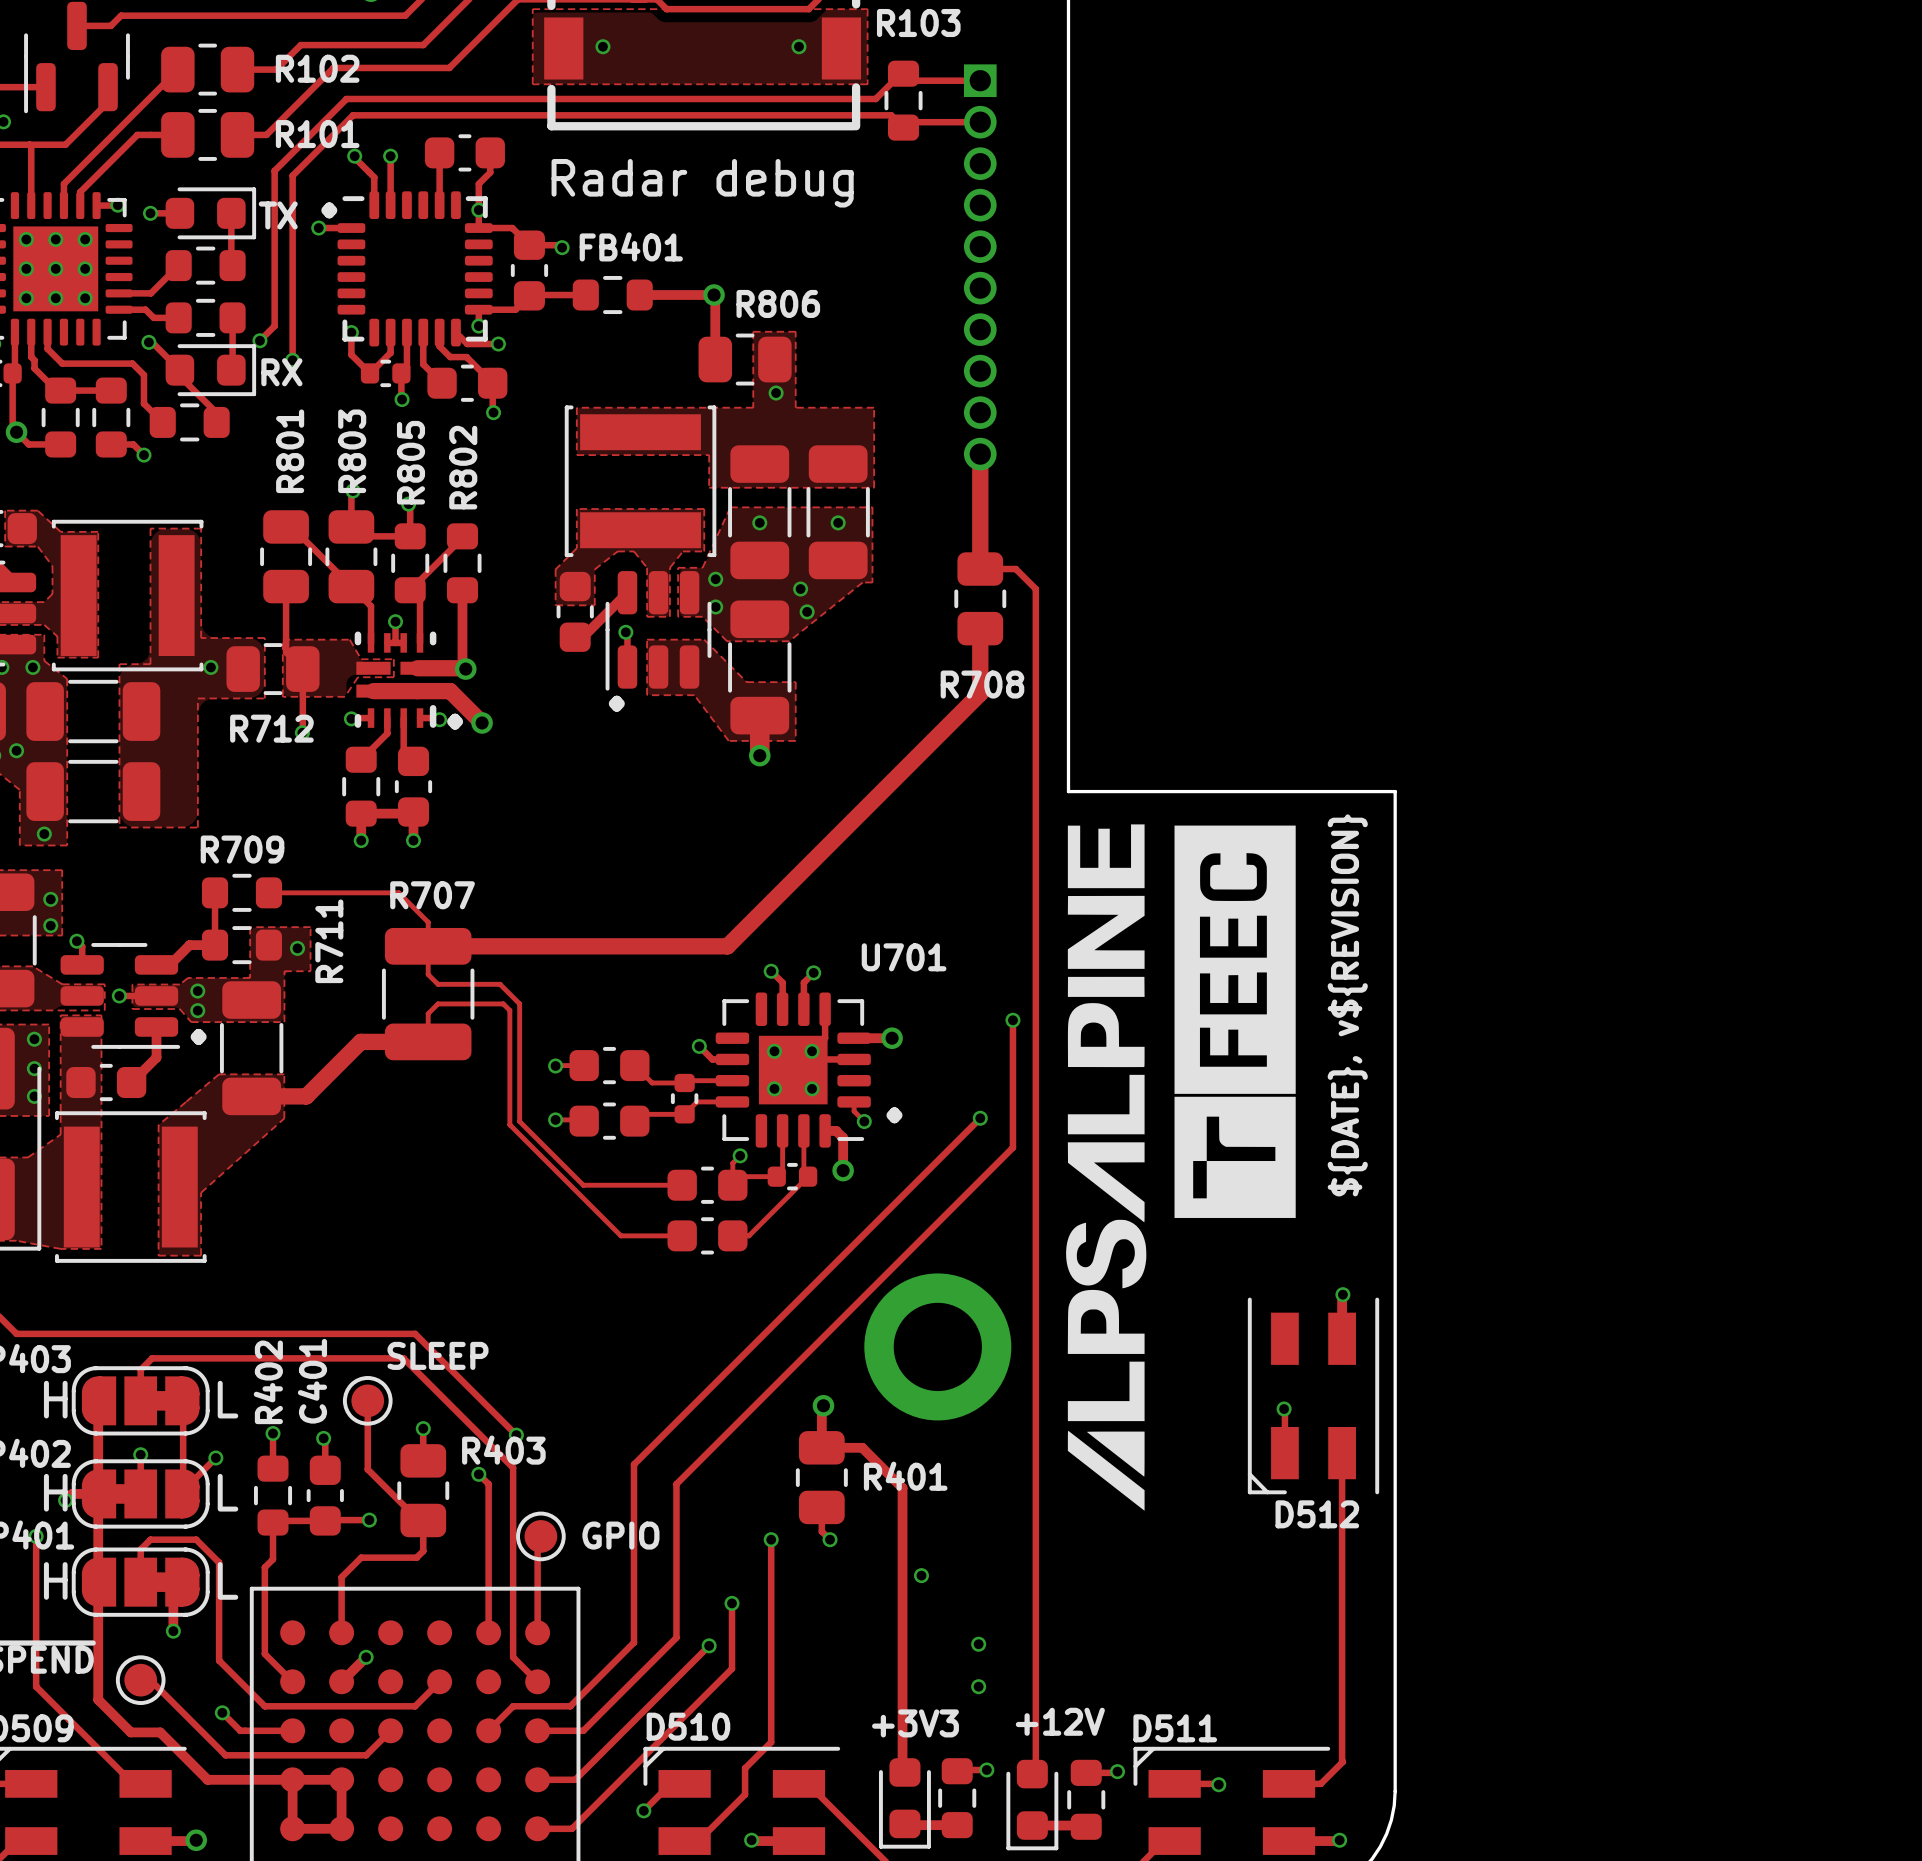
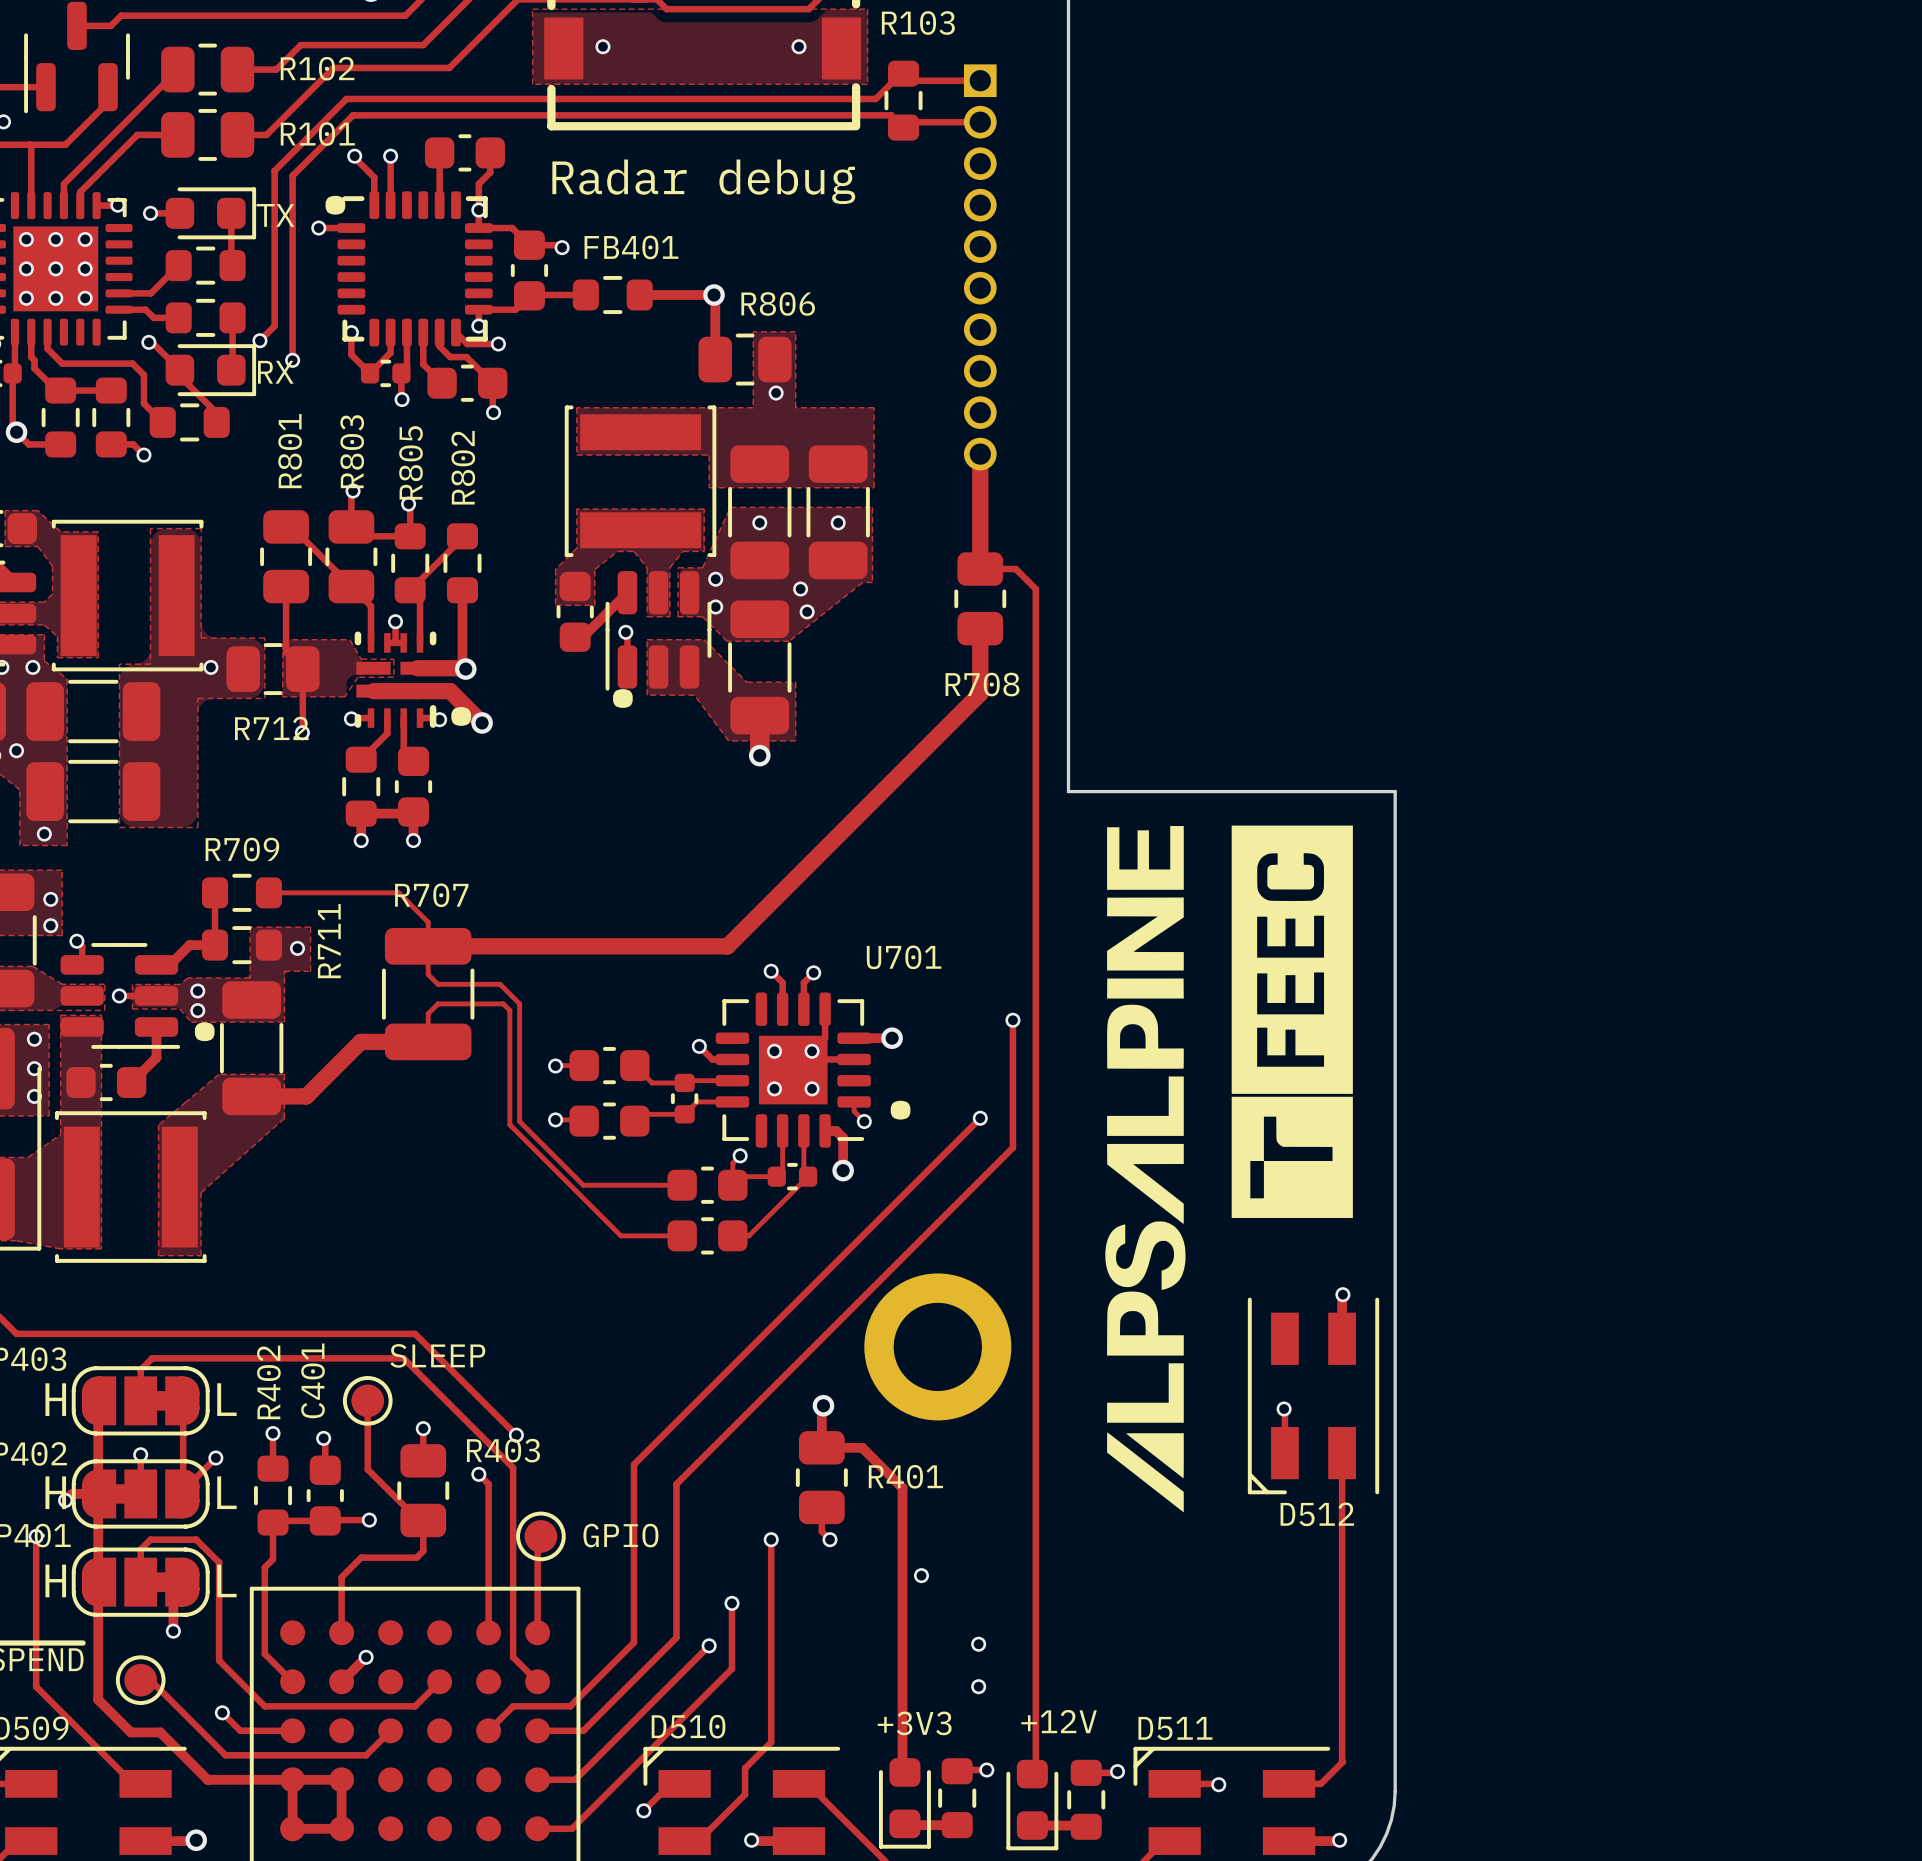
text: ${DATE}, v${REVISION} (1347, 1005) -> none
drawing position: (1235, 1021) -> (1292, 1021)
drawing position: (1106, 1167) -> (1145, 1169)

